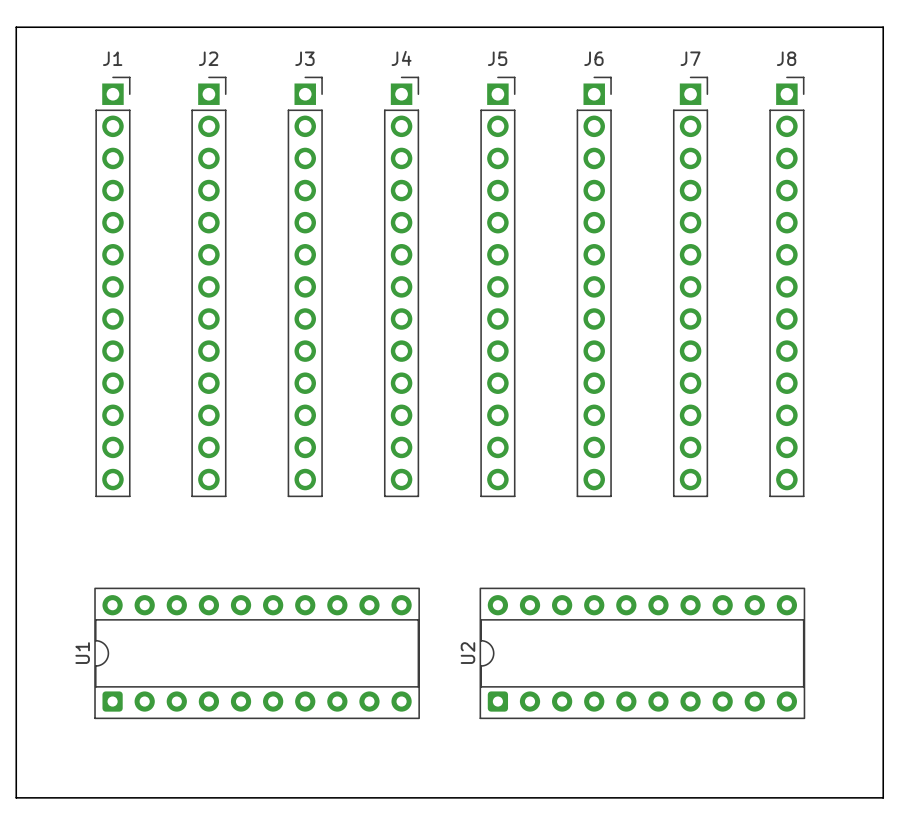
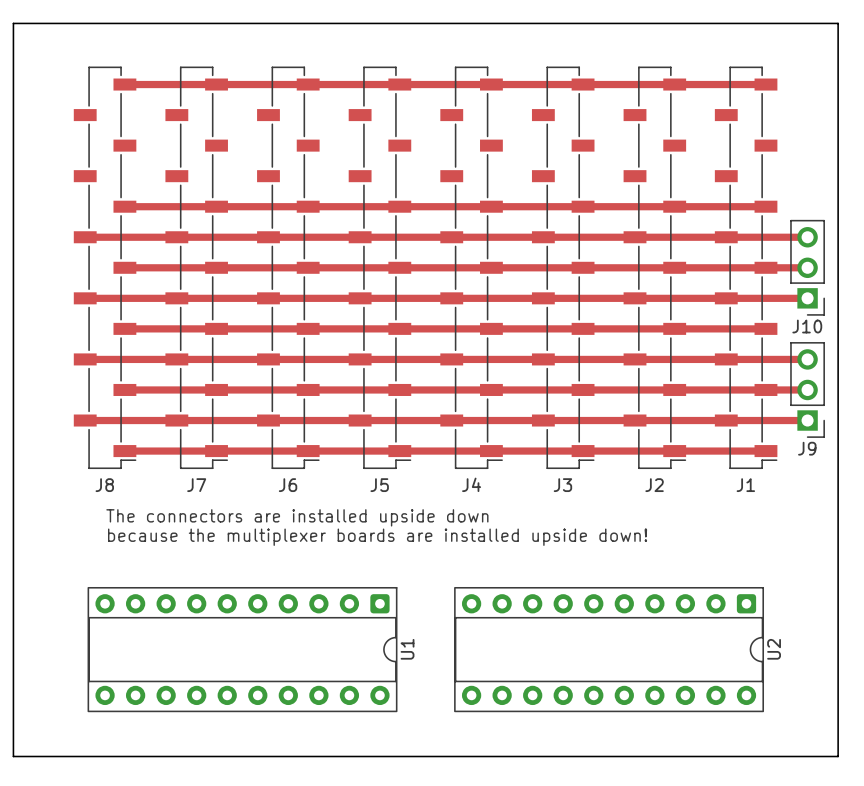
J1 name position: J1 (112, 58) -> J1 (745, 485)
J2 name position: J2 (208, 58) -> J2 (654, 485)
J3 name position: J3 (304, 58) -> J3 (562, 485)
J4 name position: J4 (401, 58) -> J4 (471, 484)
J5 name position: J5 (497, 58) -> J5 (379, 485)
J6 name position: J6 (593, 58) -> J6 (288, 485)
J7 name position: J7 (690, 58) -> J7 (196, 485)
J8 name position: J8 (786, 58) -> J8 (104, 485)
J1 footprint: [95, 76, 131, 498] -> [714, 66, 778, 469]
J2 footprint: [191, 76, 227, 498] -> [623, 66, 687, 469]
J3 footprint: [287, 76, 323, 498] -> [531, 66, 595, 469]
J4 footprint: [384, 76, 420, 498] -> [440, 66, 503, 469]
J5 footprint: [480, 76, 516, 498] -> [348, 66, 412, 469]
J6 footprint: [576, 76, 612, 498] -> [257, 66, 320, 469]
J7 footprint: [672, 76, 709, 498] -> [165, 66, 228, 469]
J8 footprint: [769, 76, 805, 498] -> [73, 66, 137, 469]
track: none -> (124, 84) (765, 84)
track: none -> (124, 206) (765, 206)
track: none -> (85, 237) (807, 237)
track: none -> (124, 267) (807, 267)
J10: none -> (807, 267)
track: none -> (85, 298) (807, 298)
track: none -> (124, 328) (765, 328)
track: none -> (85, 359) (807, 359)
track: none -> (124, 389) (807, 389)
J9: none -> (807, 389)
track: none -> (85, 420) (807, 420)
track: none -> (124, 451) (765, 451)
text: none -> The connectors are installed upside down (297, 517)
text: none -> because the multiplexer boards are installed upside down! (377, 537)
U1 rotation: 0° (257, 653) -> 180° (242, 649)
U2 rotation: 0° (642, 653) -> 180° (609, 649)

